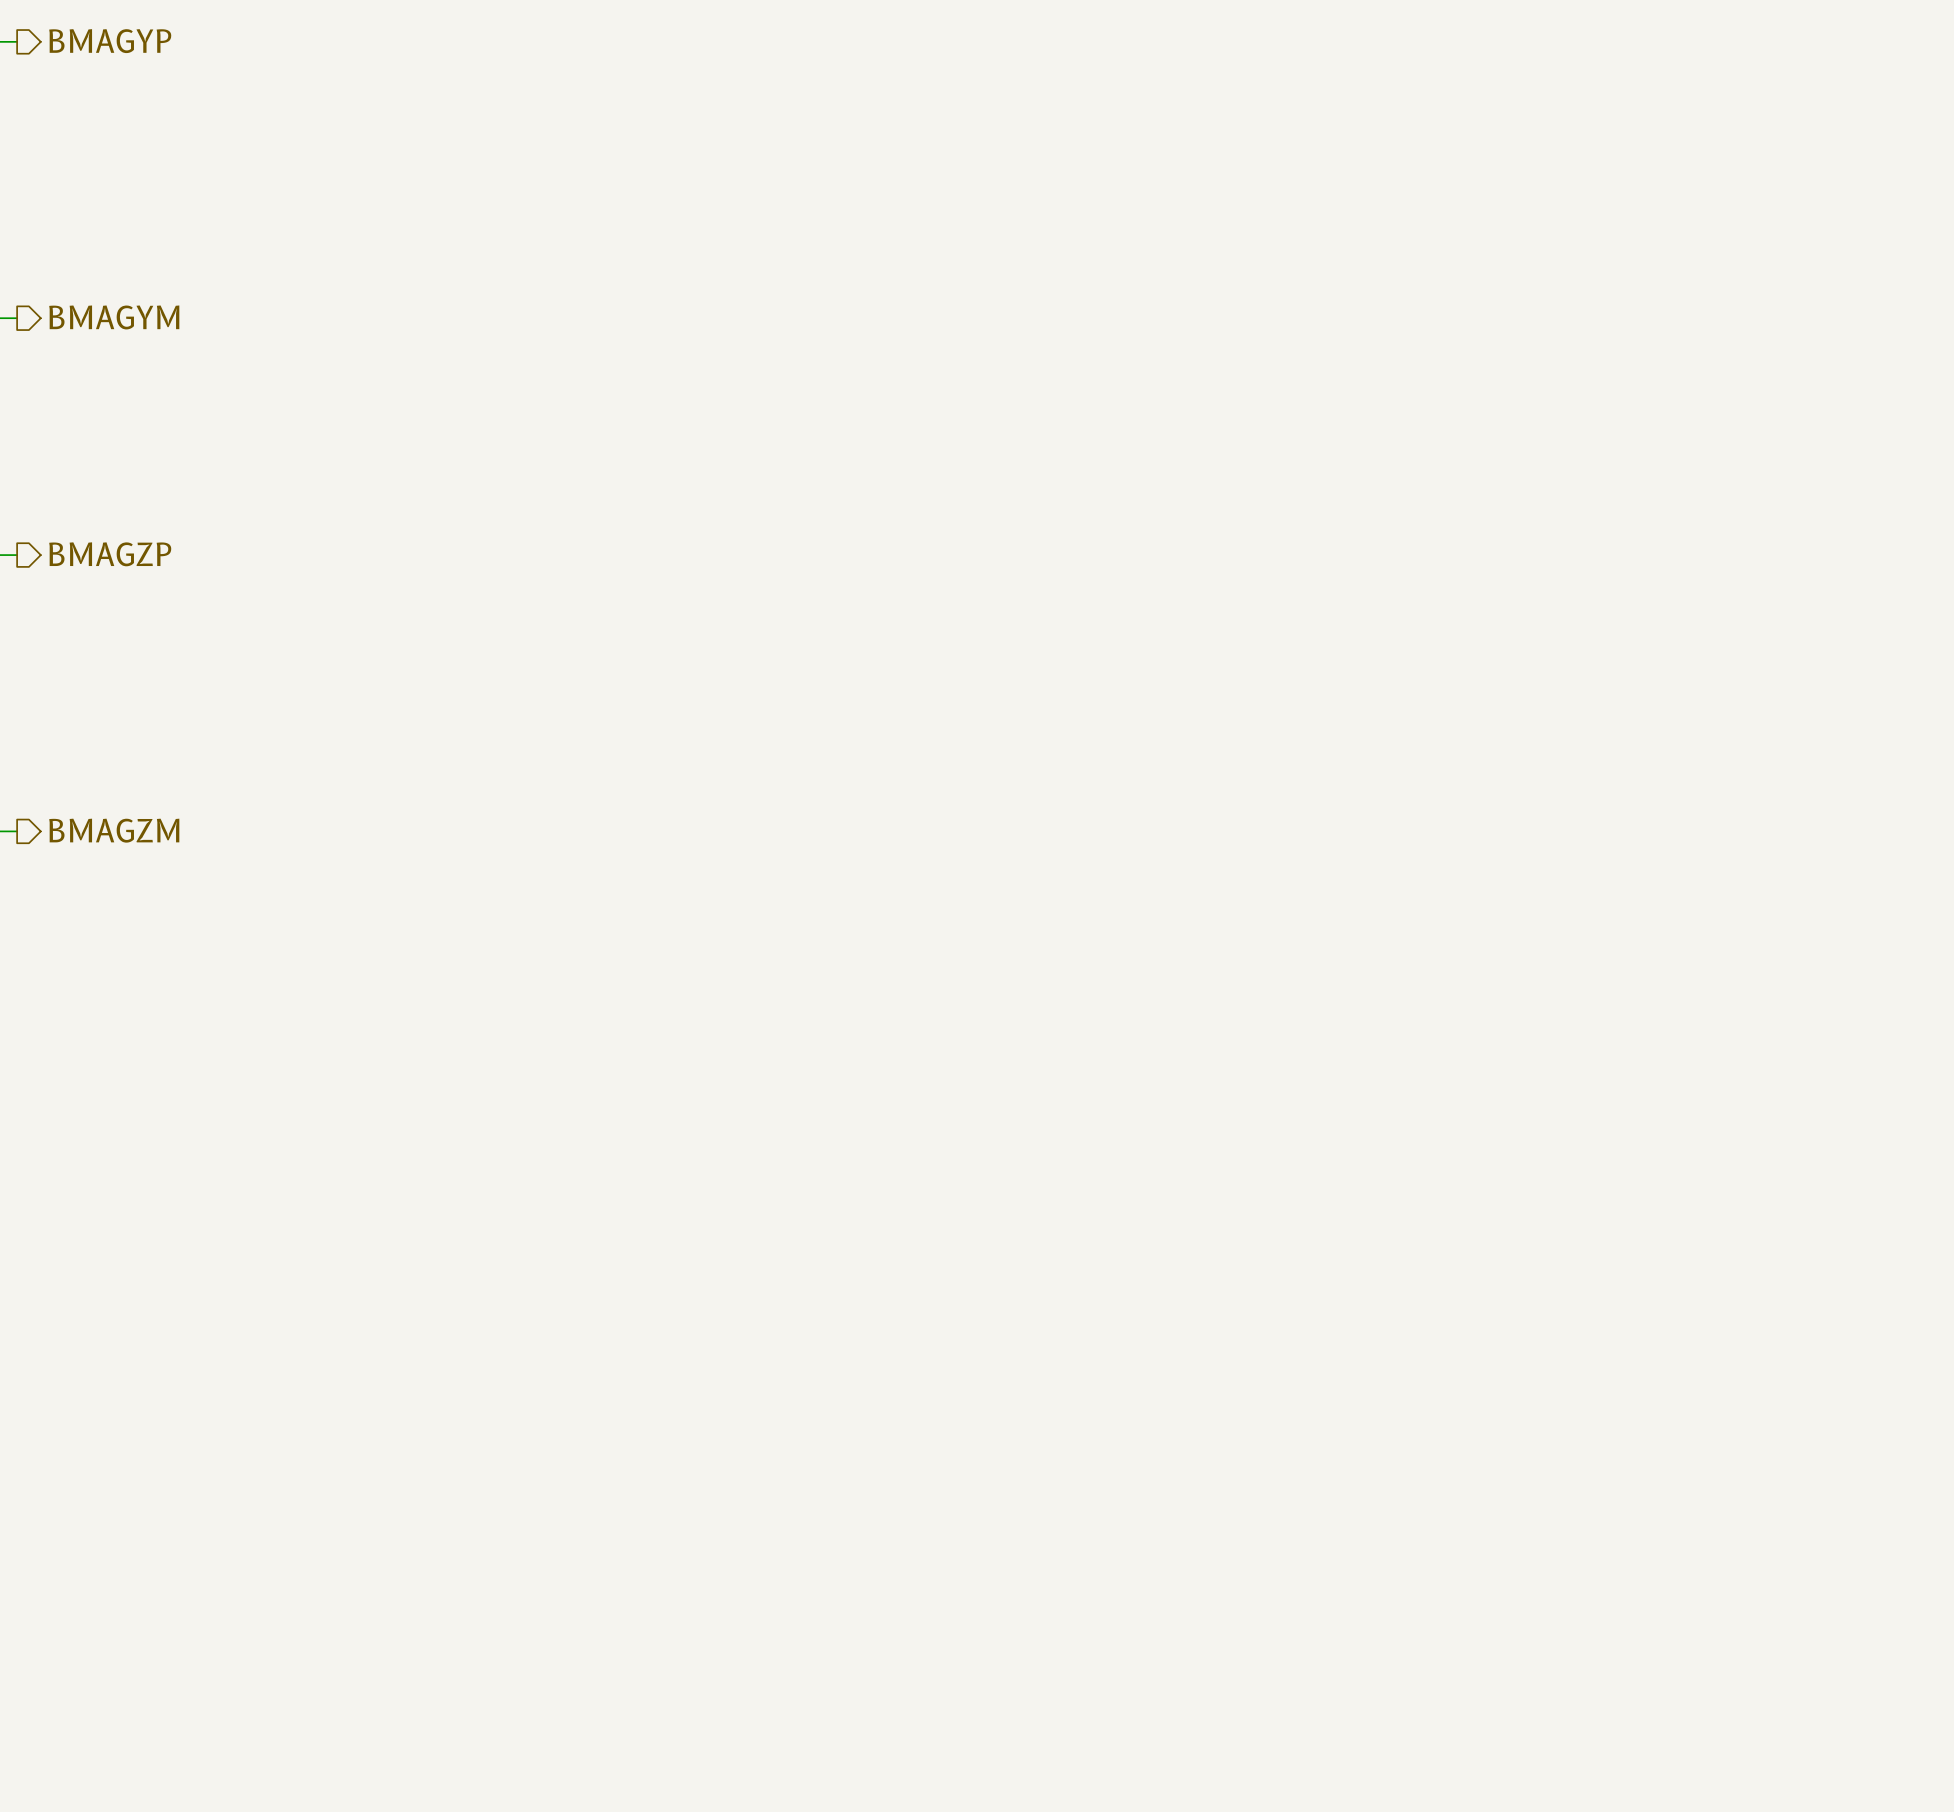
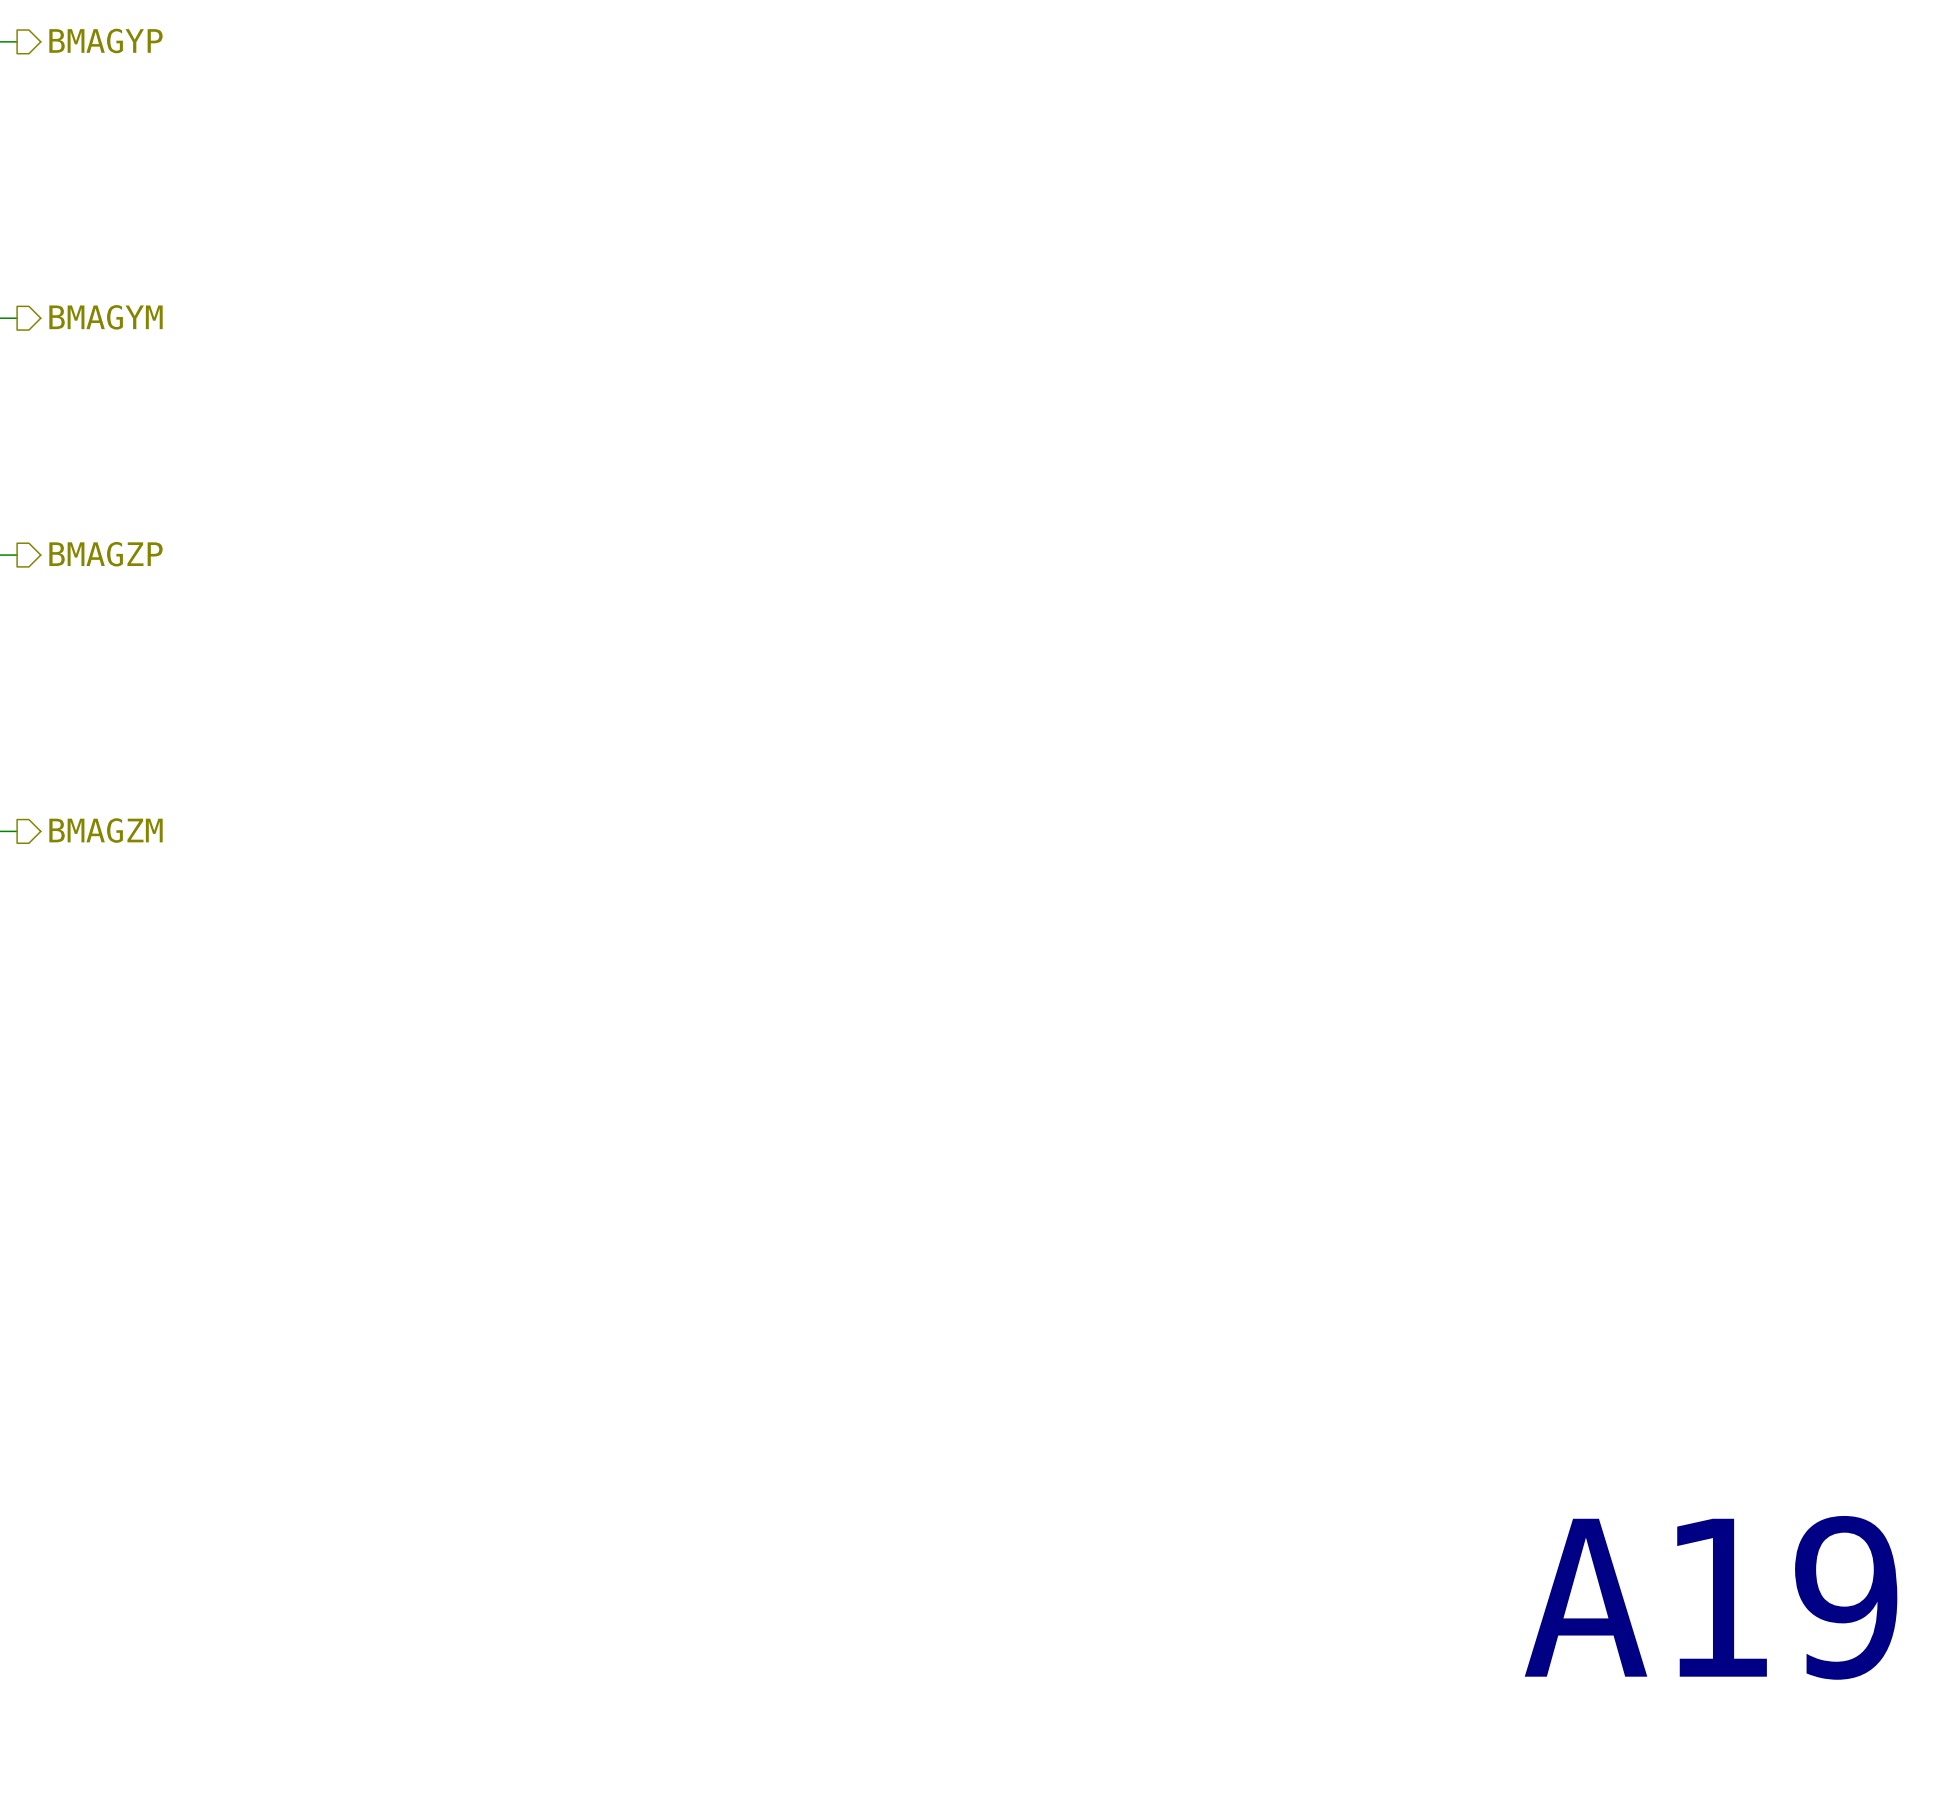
text: none -> A19 (1711, 1597)

